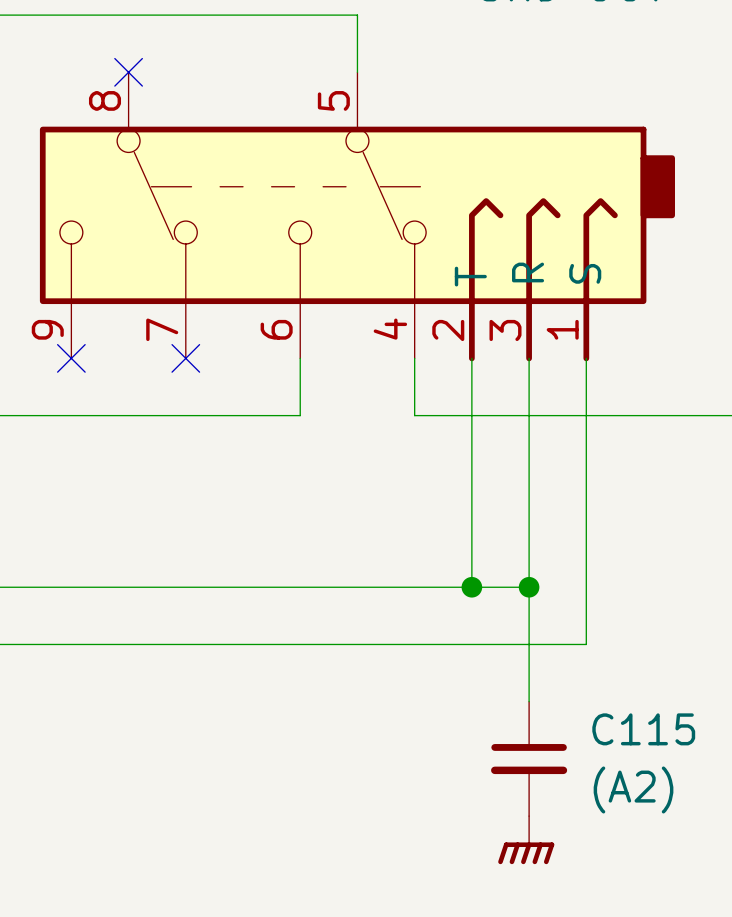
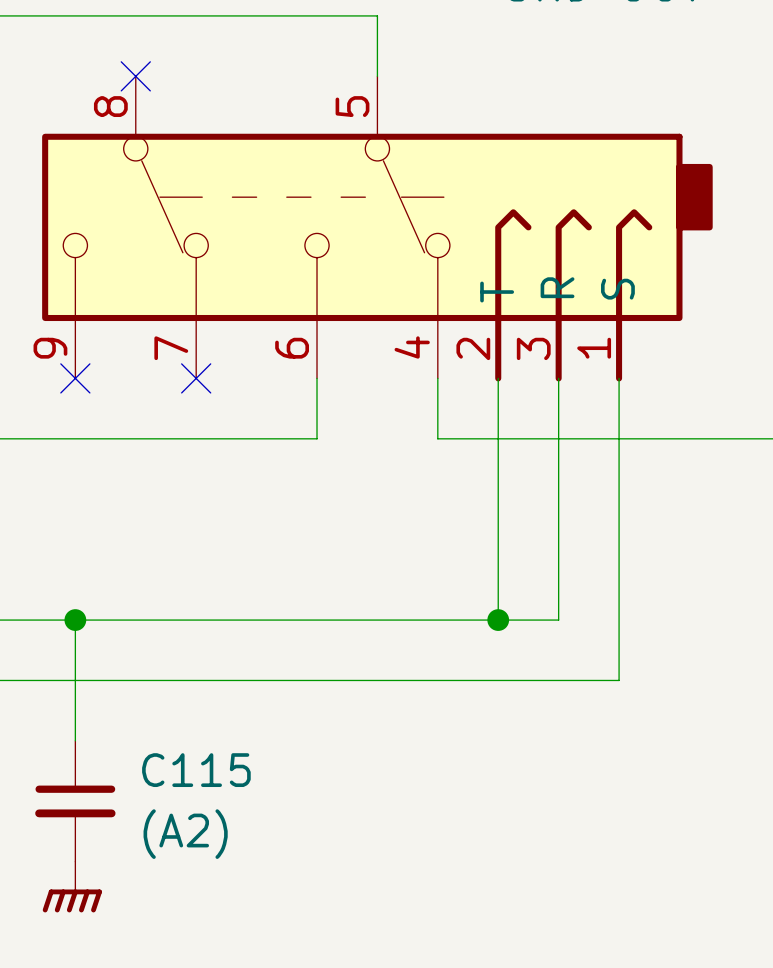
junction: none -> (75, 620)
wire: (529, 587) (529, 701) -> (75, 620) (75, 740)
junction: (529, 587) -> none
C115 position: (529, 758) -> (75, 801)
power symbol position: (526, 840) -> (72, 887)

